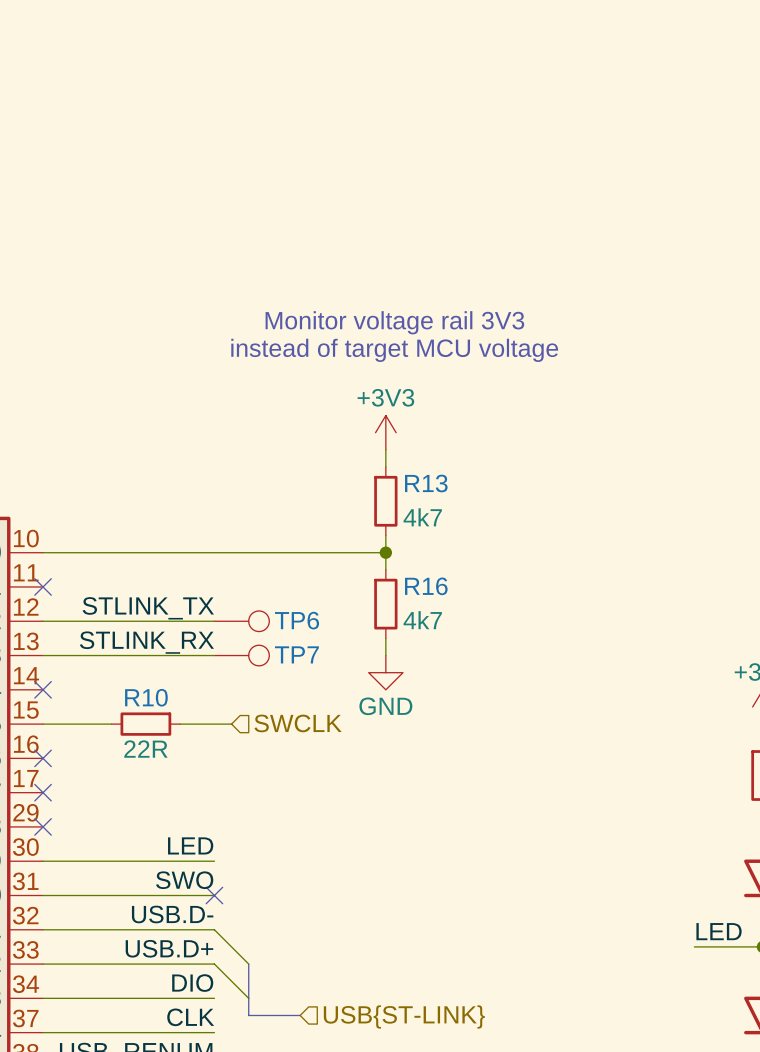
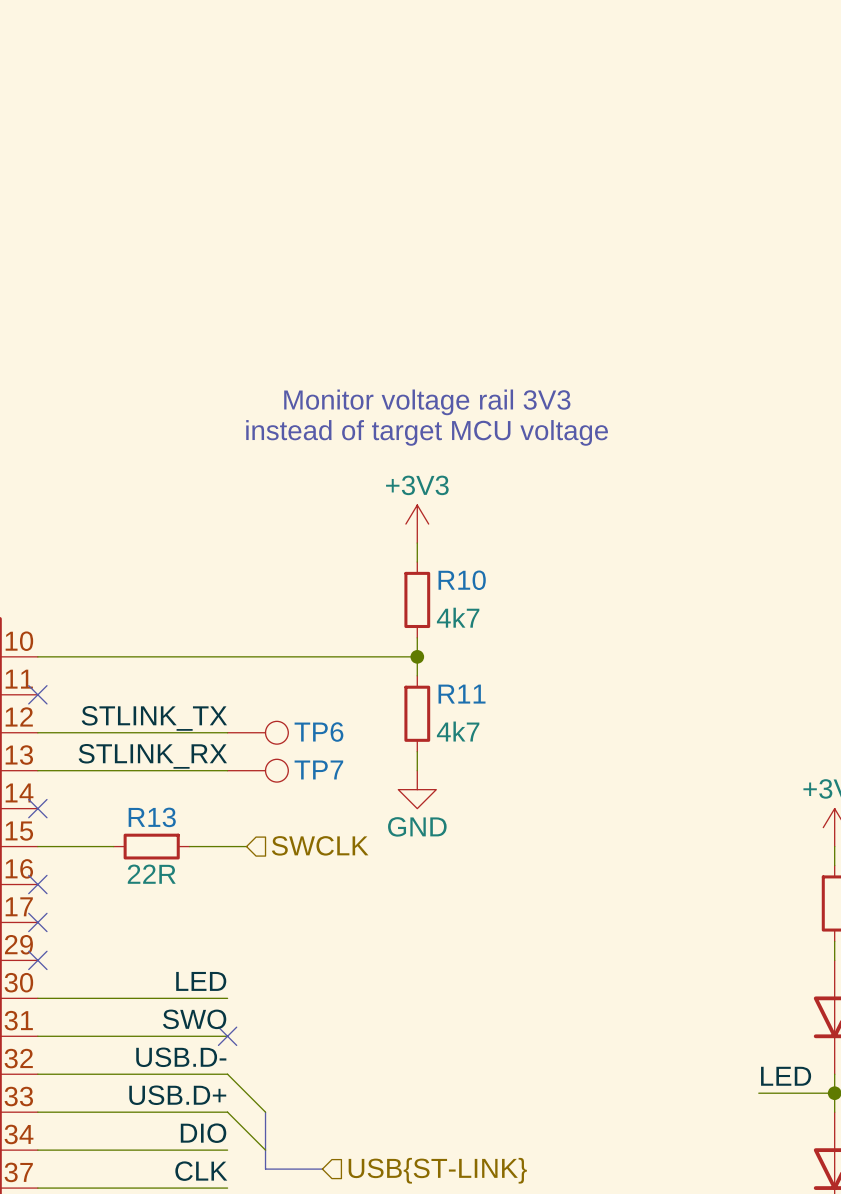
R13 name: R13 (426, 483) -> R10 (462, 580)
R16 name: R16 (426, 586) -> R11 (462, 694)
R10 name: R10 (146, 697) -> R13 (152, 817)

